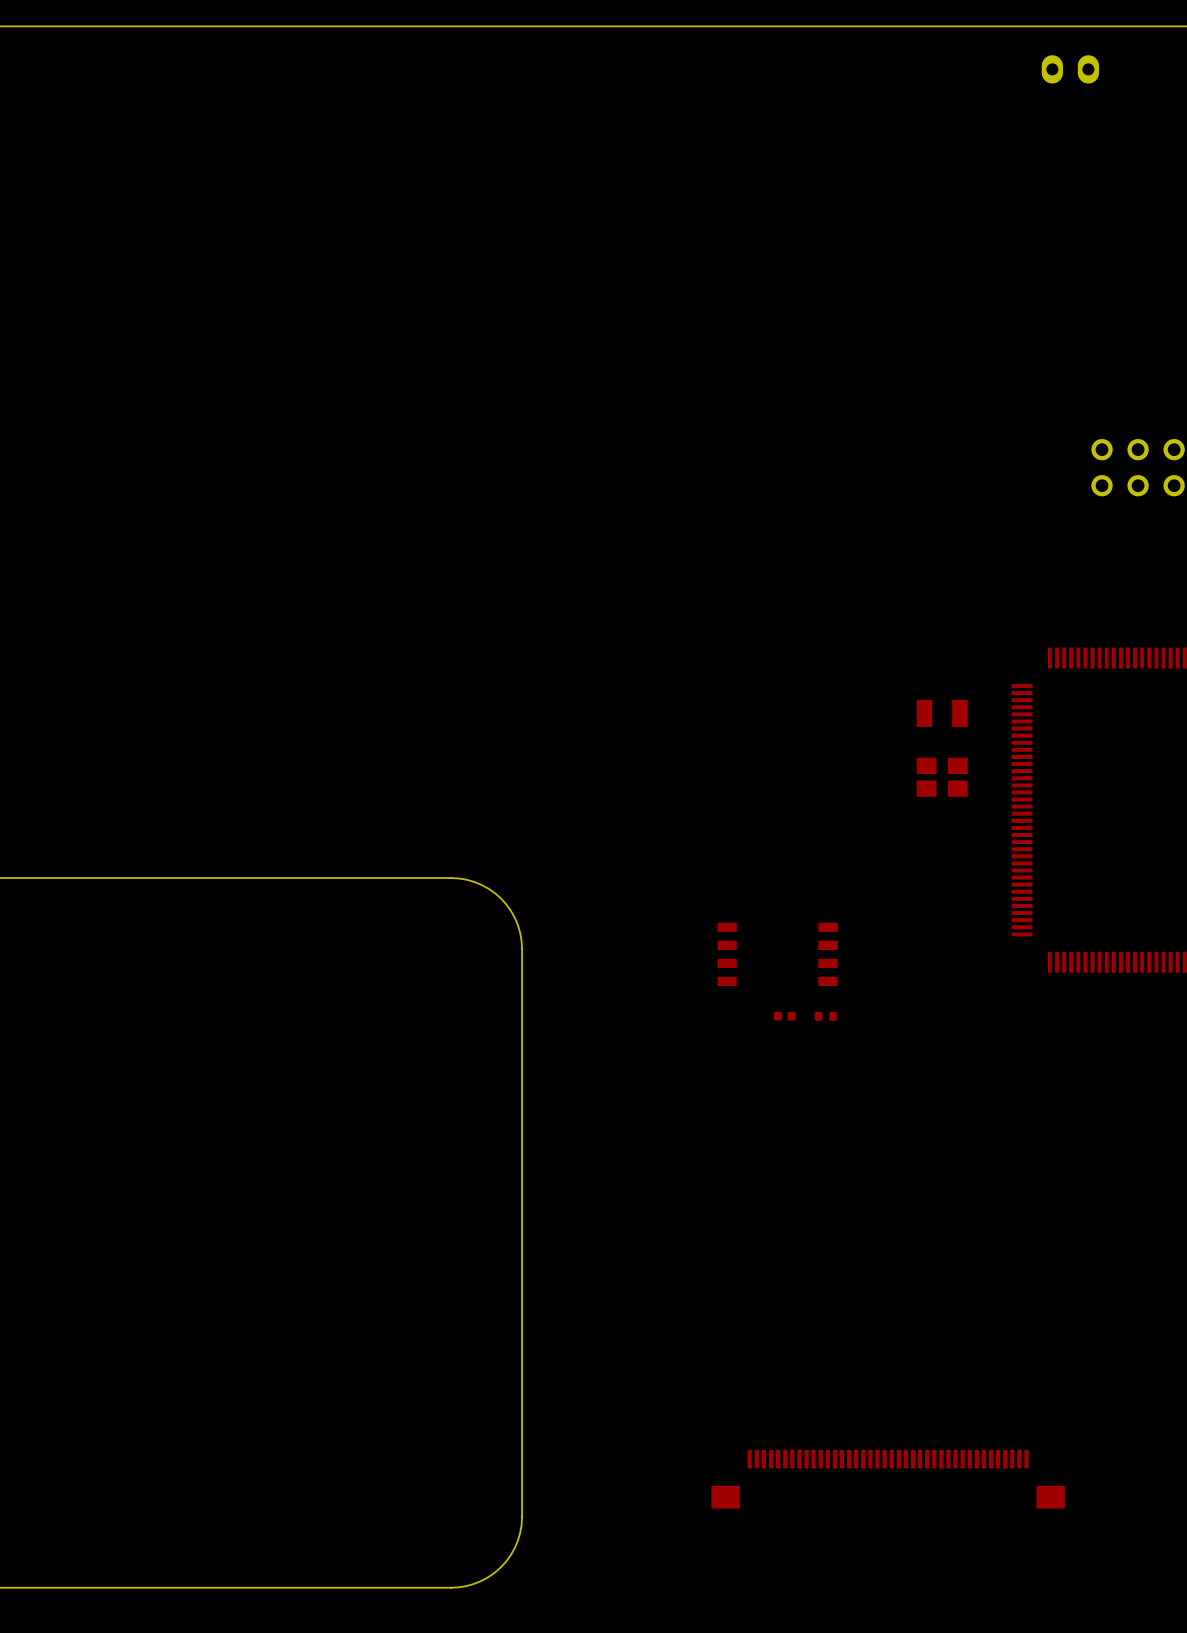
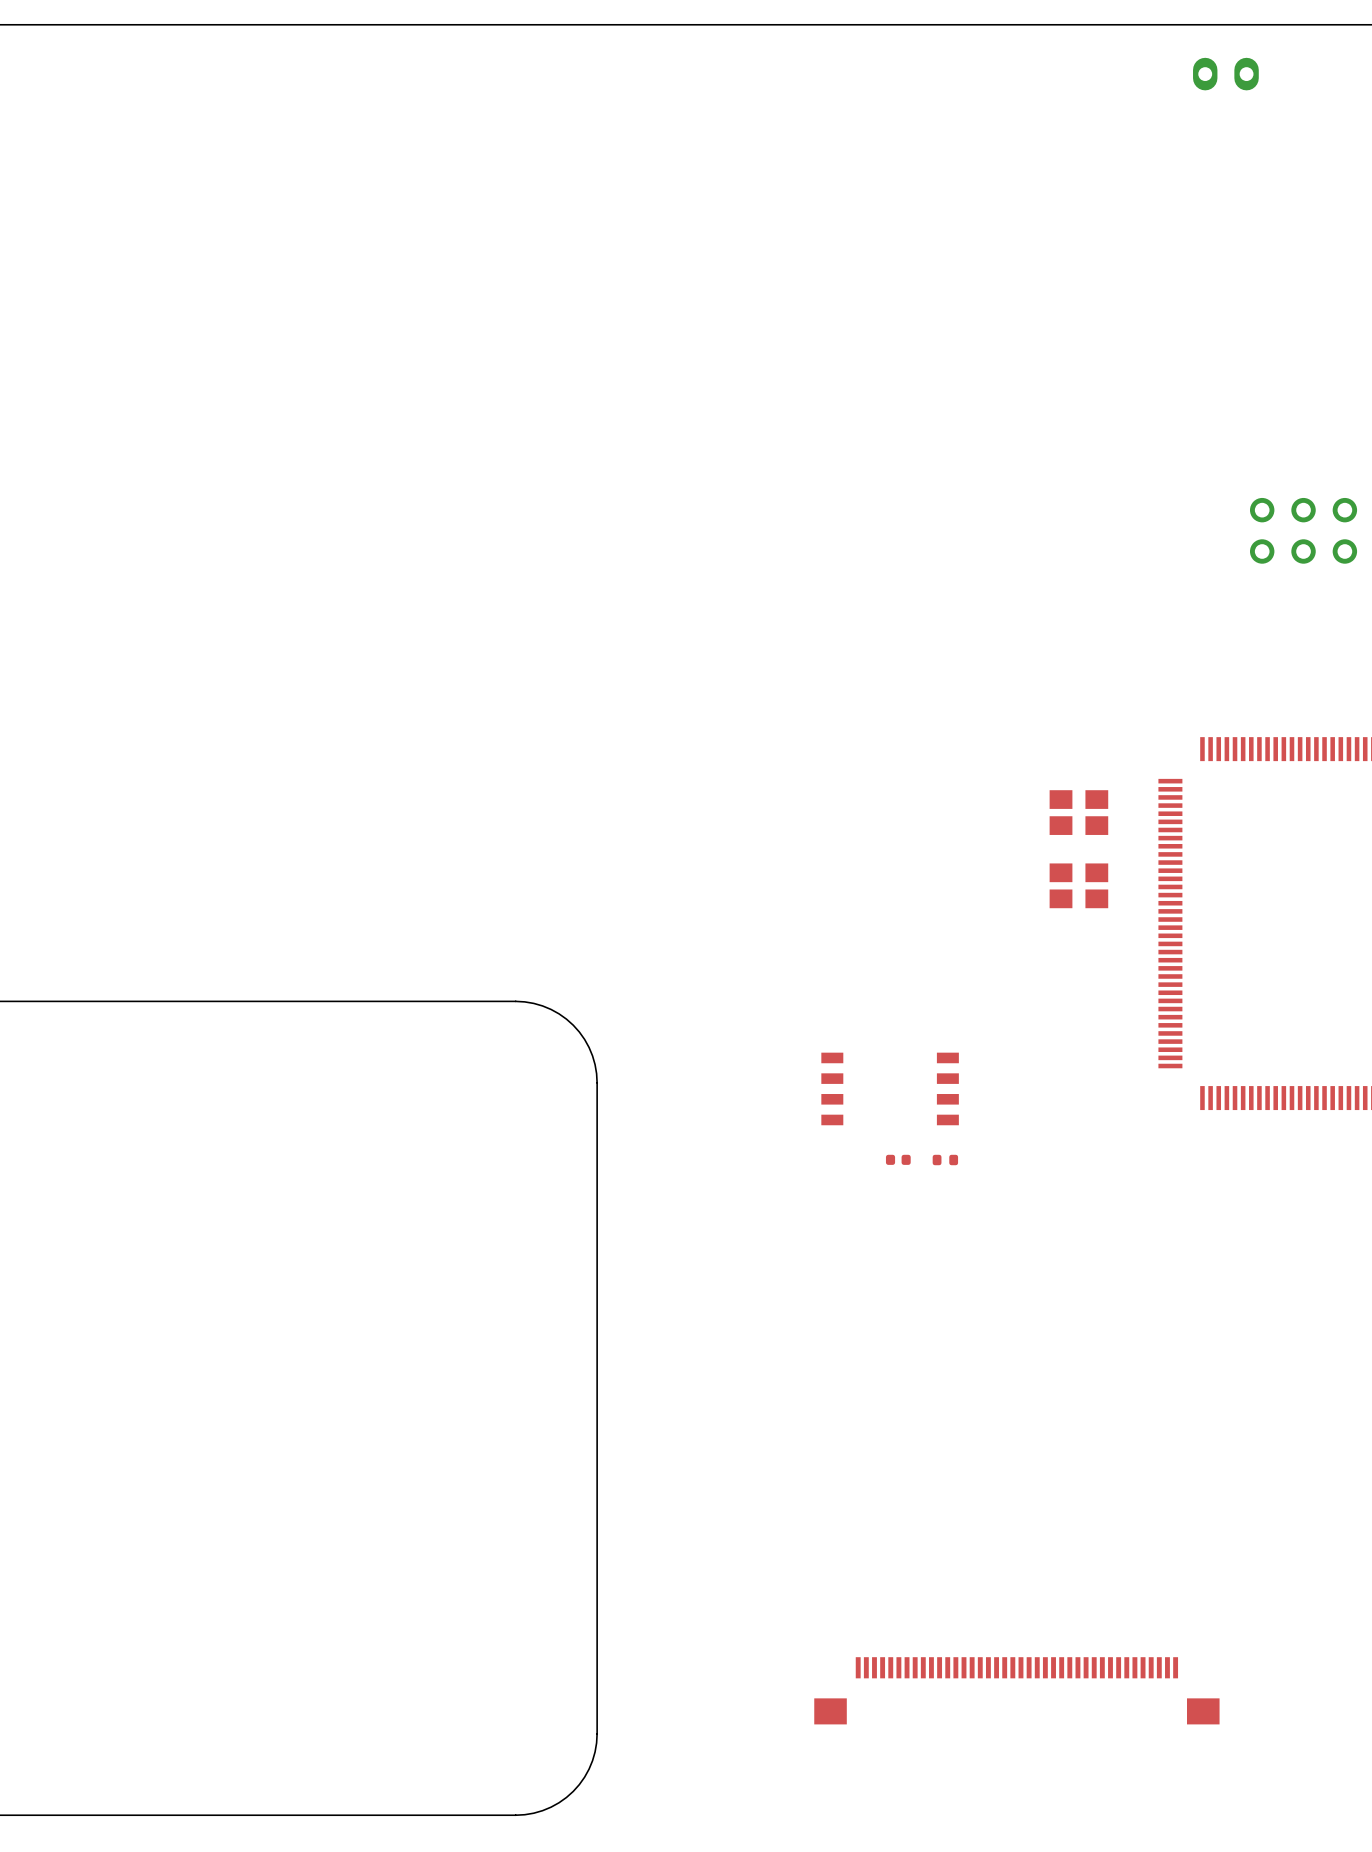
part footprint: [916, 699, 968, 727] -> [1049, 790, 1109, 835]

